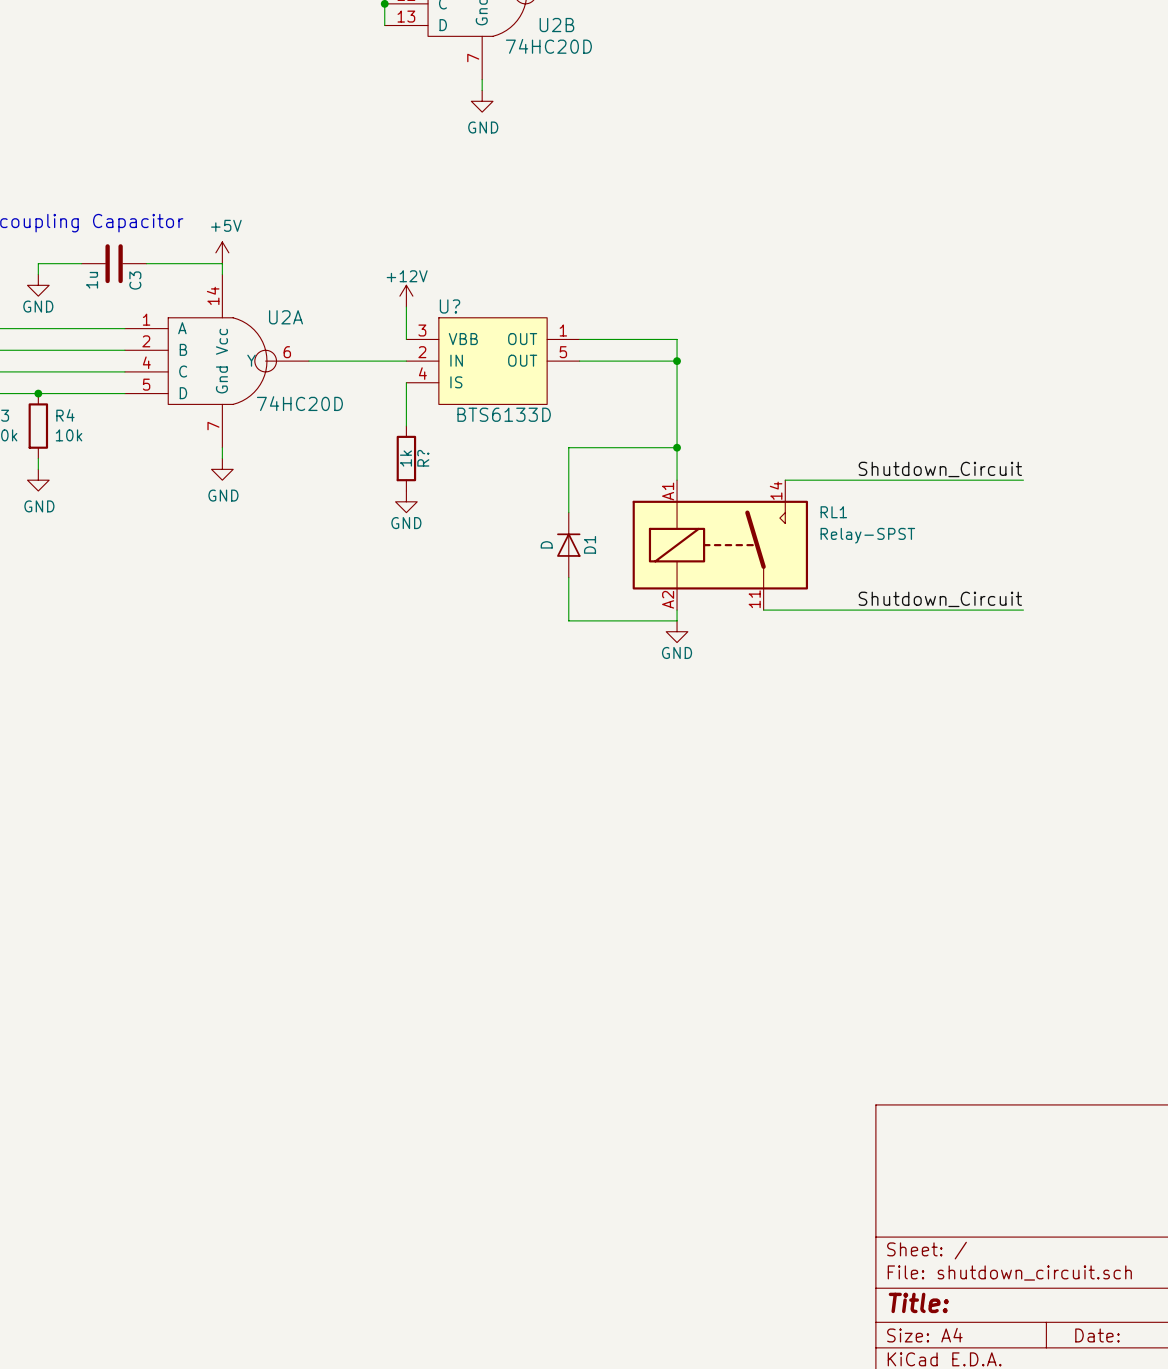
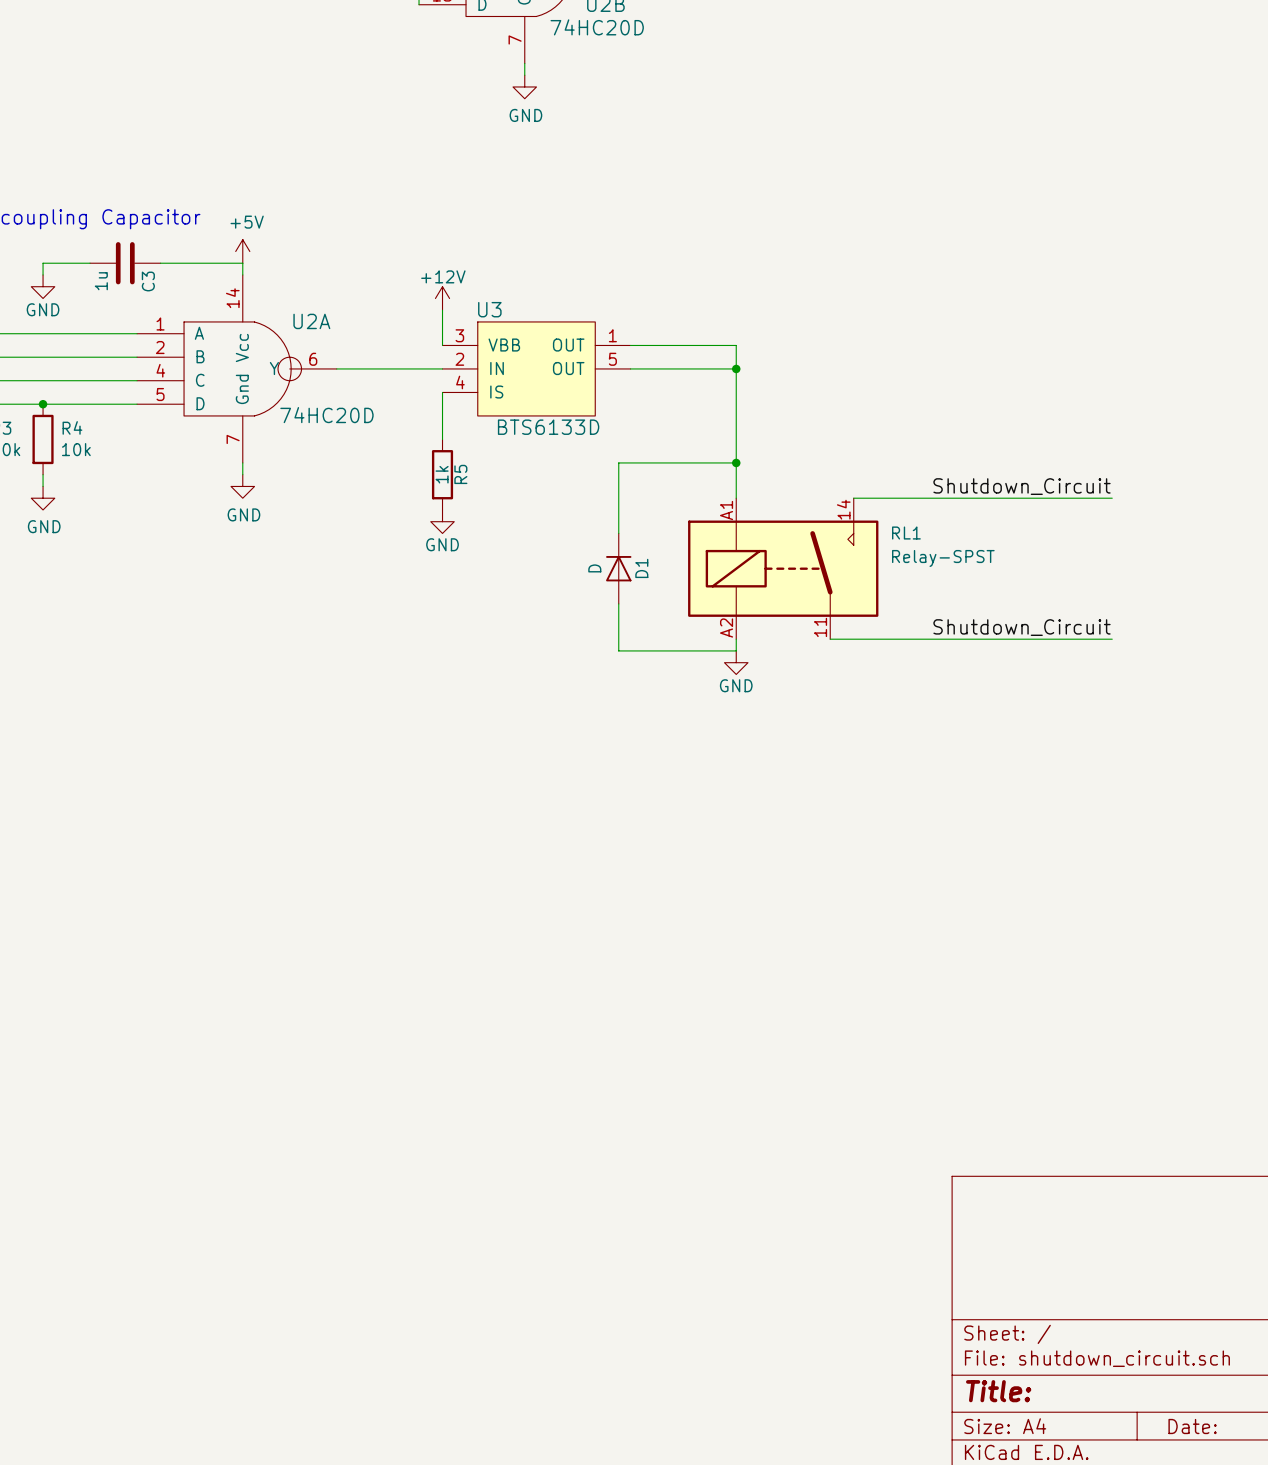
U? name: U? (450, 306) -> U3 (489, 309)
R? name: R? (423, 458) -> R5 (460, 474)

